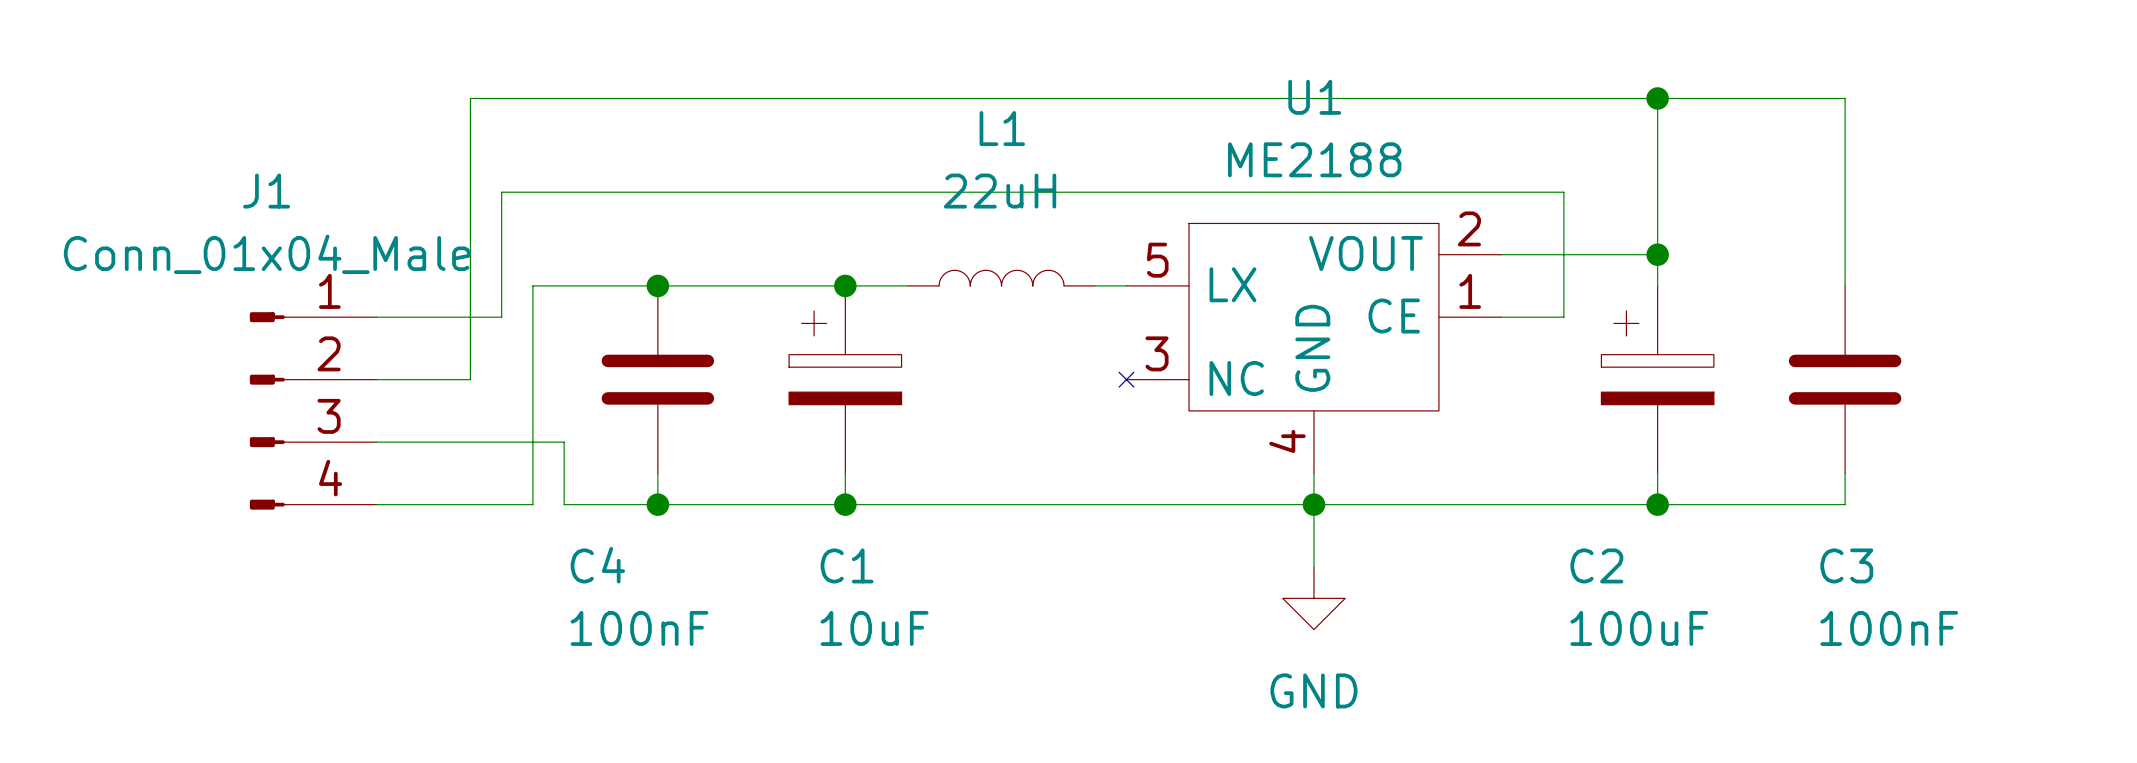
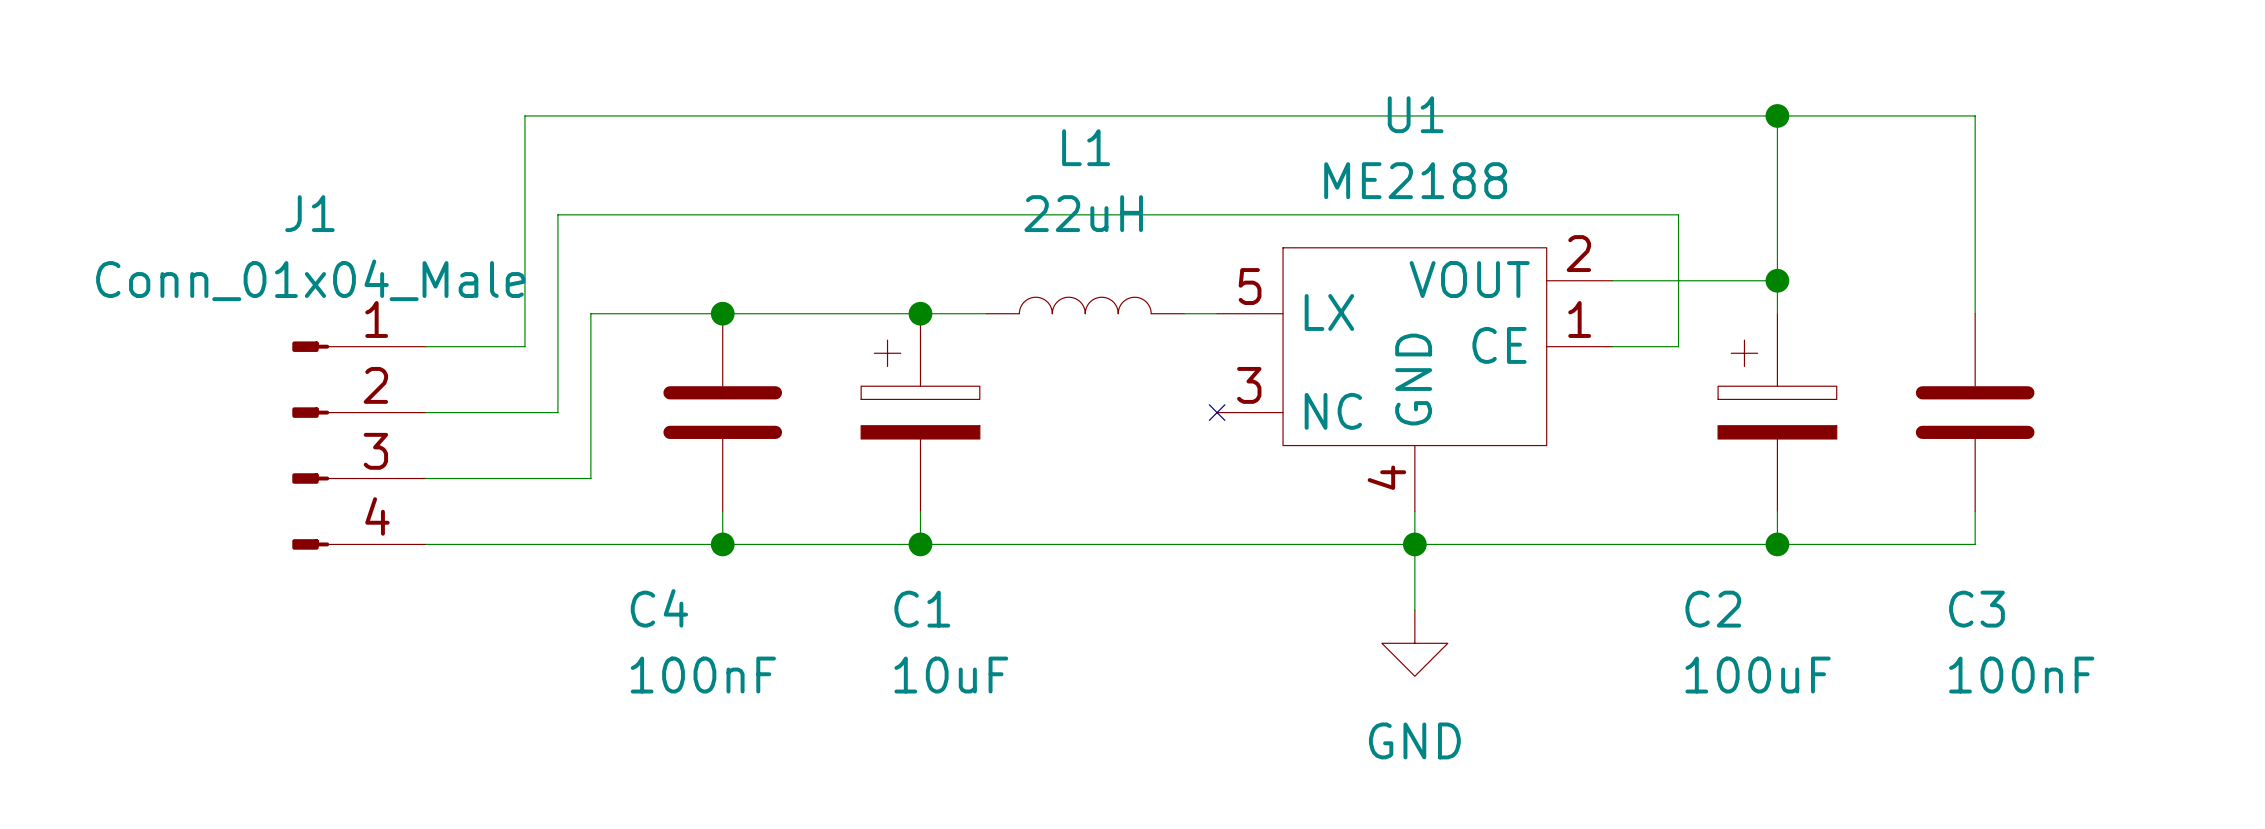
wire: (501, 317) (470, 317) (470, 379) -> (557, 346) (557, 412) (524, 412)
wire: (532, 504) (532, 442) (564, 442) (564, 504) -> (590, 544) (623, 544)

